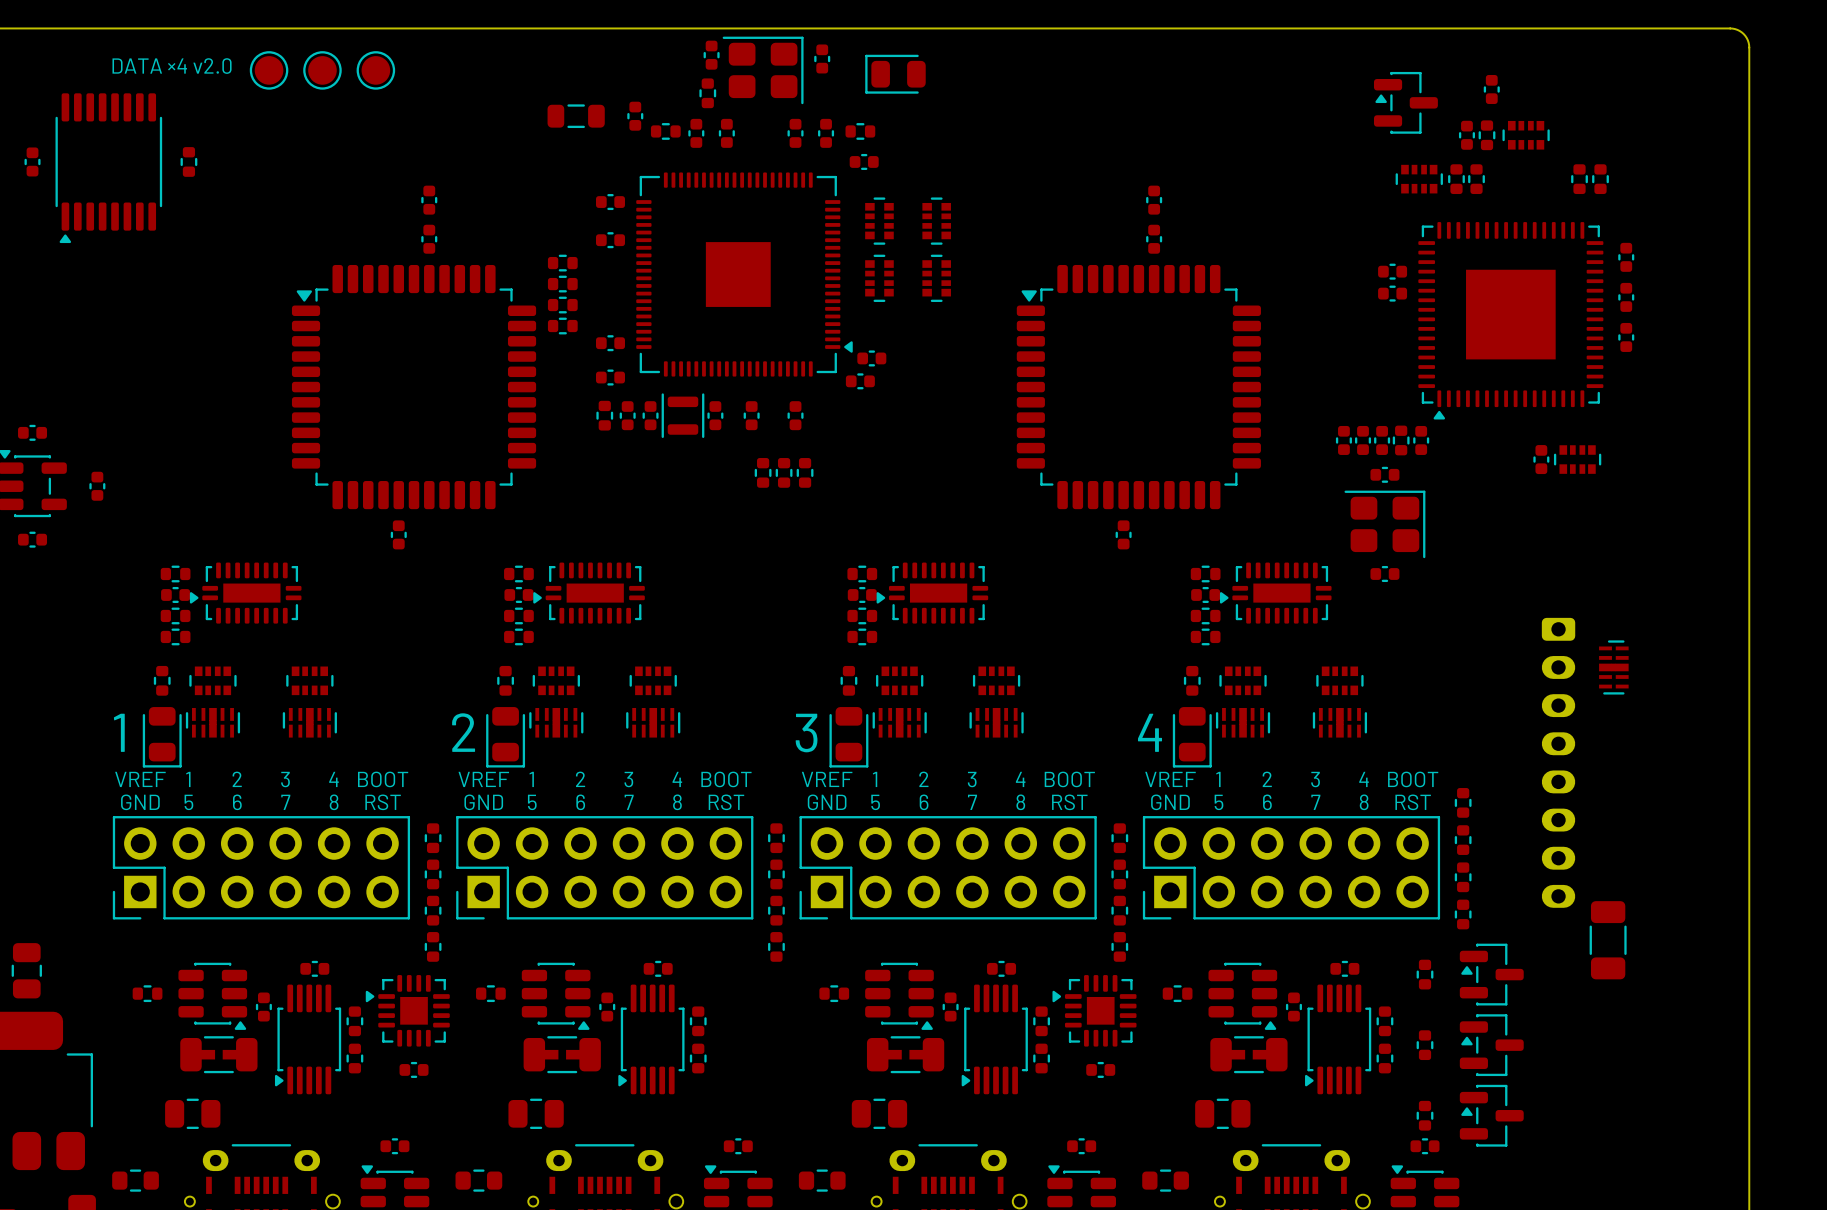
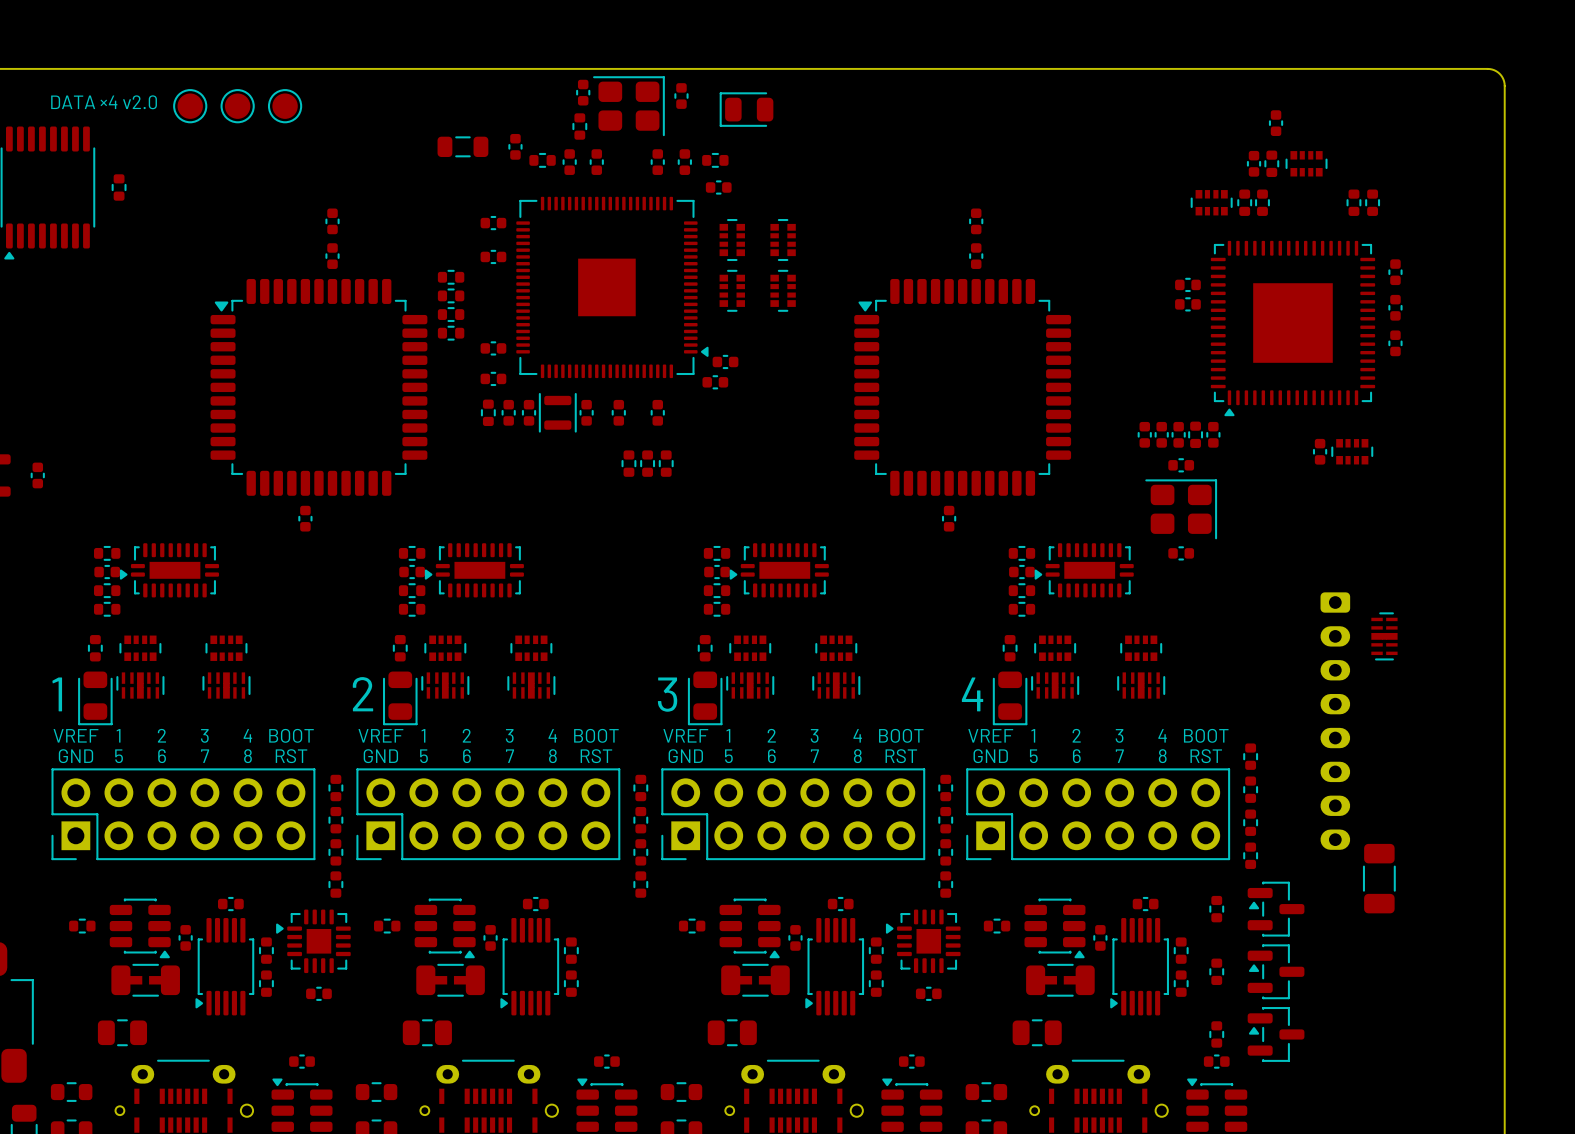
part: (1405, 102) -> none

